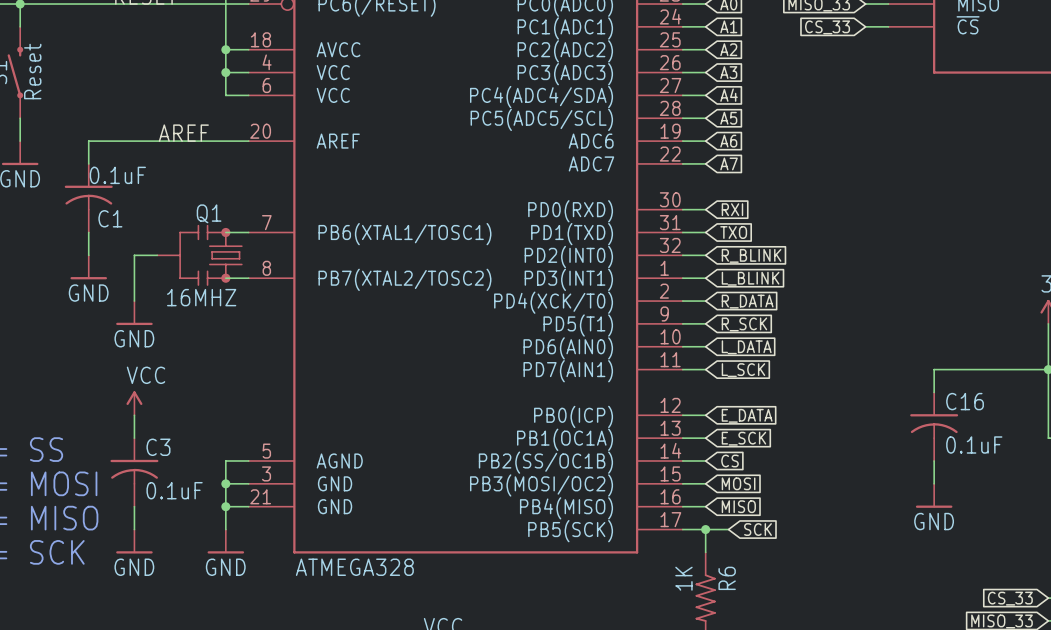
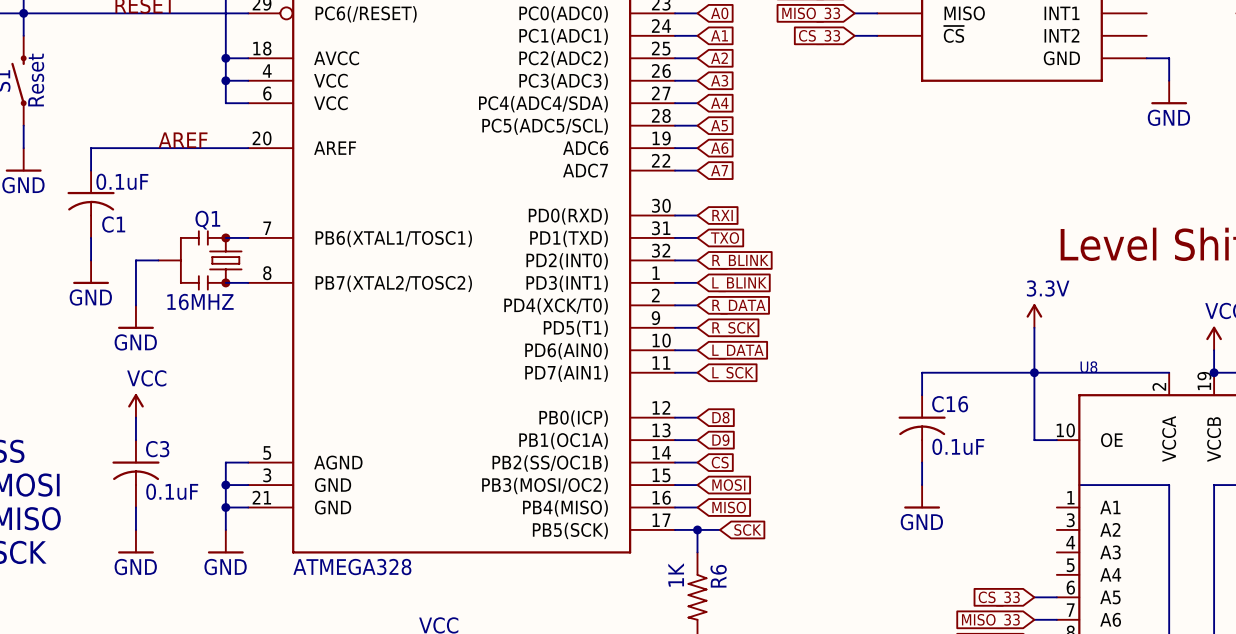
global label: E_DATA (747, 415) -> D8 (720, 417)
global label: E_SCK (743, 438) -> D9 (720, 440)

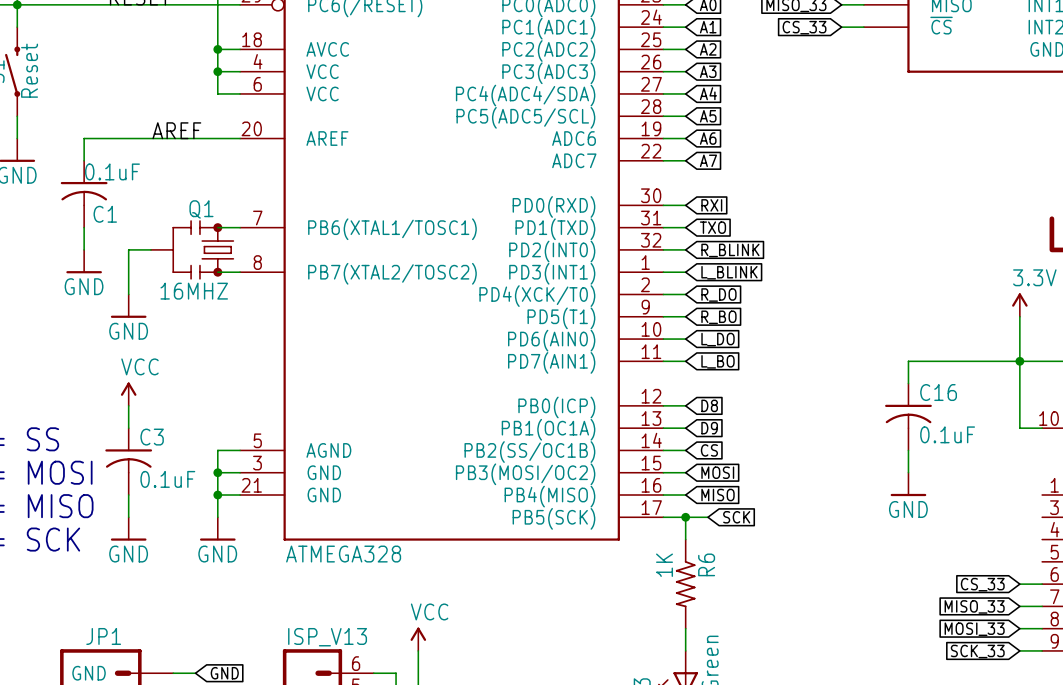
global label: R_DATA (738, 307) -> R_DO (718, 295)
global label: R_SCK (733, 329) -> R_BO (718, 317)
global label: L_DATA (737, 352) -> L_DO (718, 339)
global label: L_SCK (732, 374) -> L_BO (718, 361)

